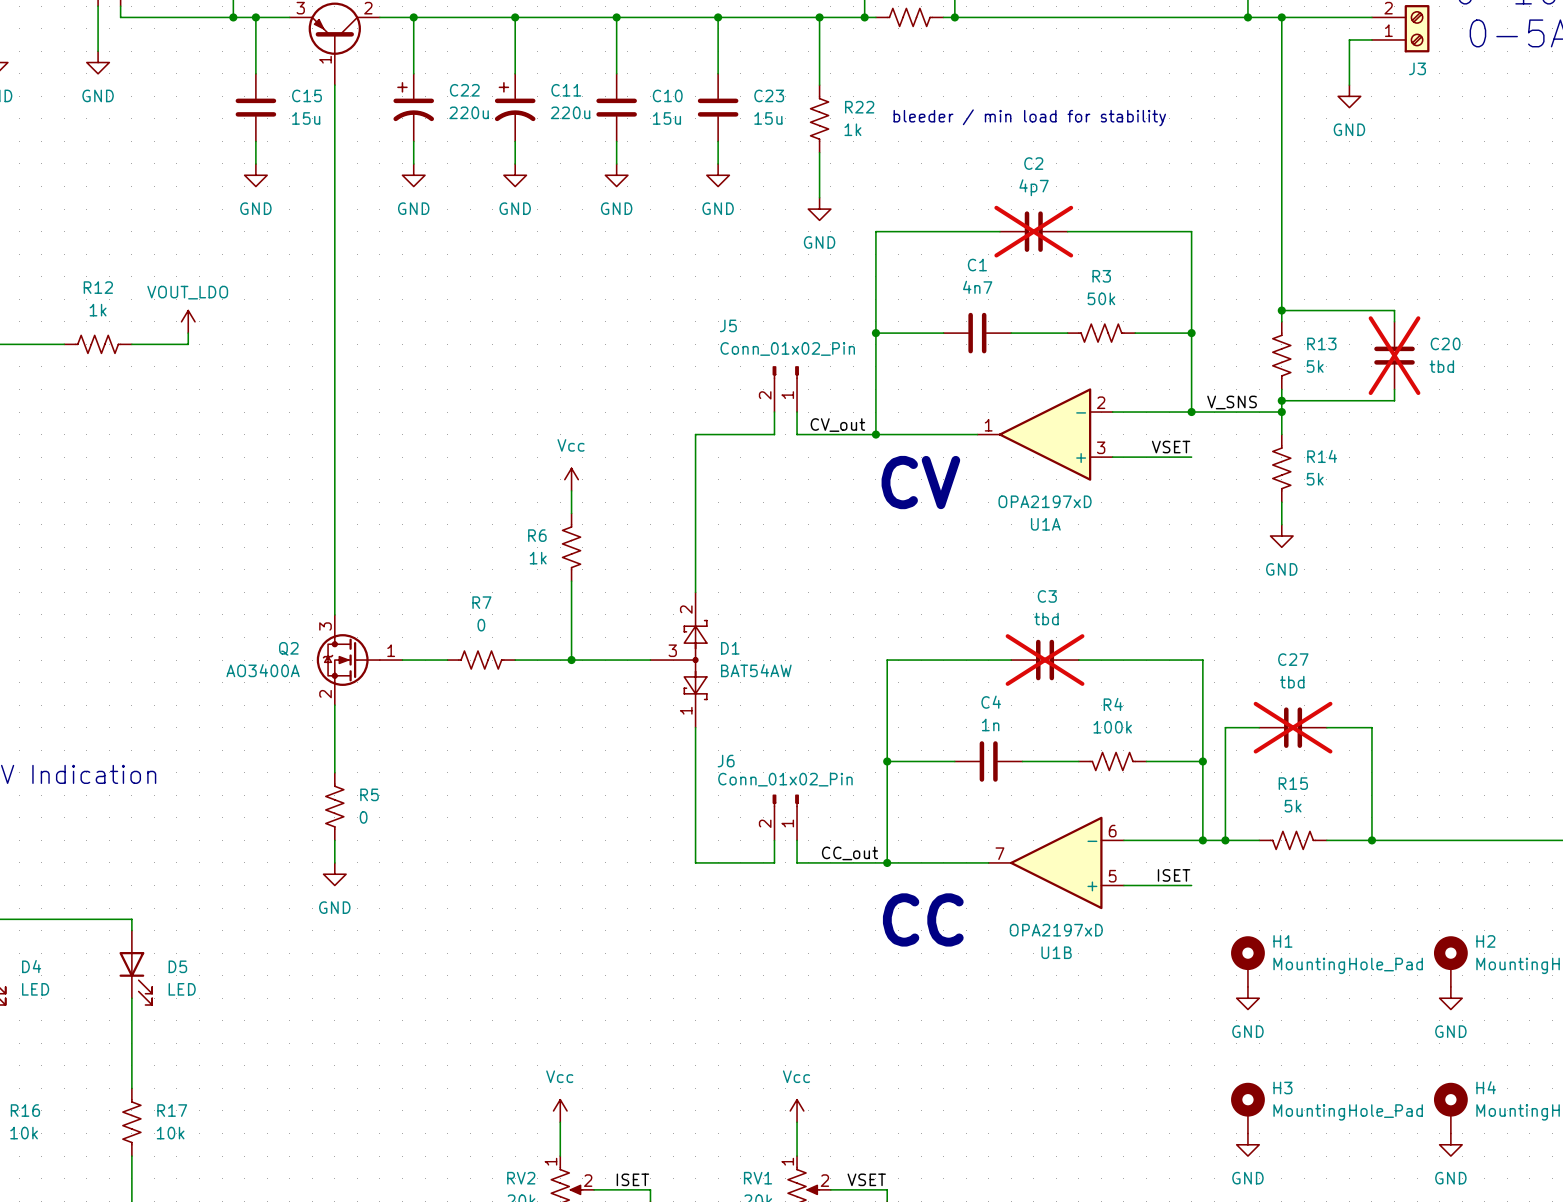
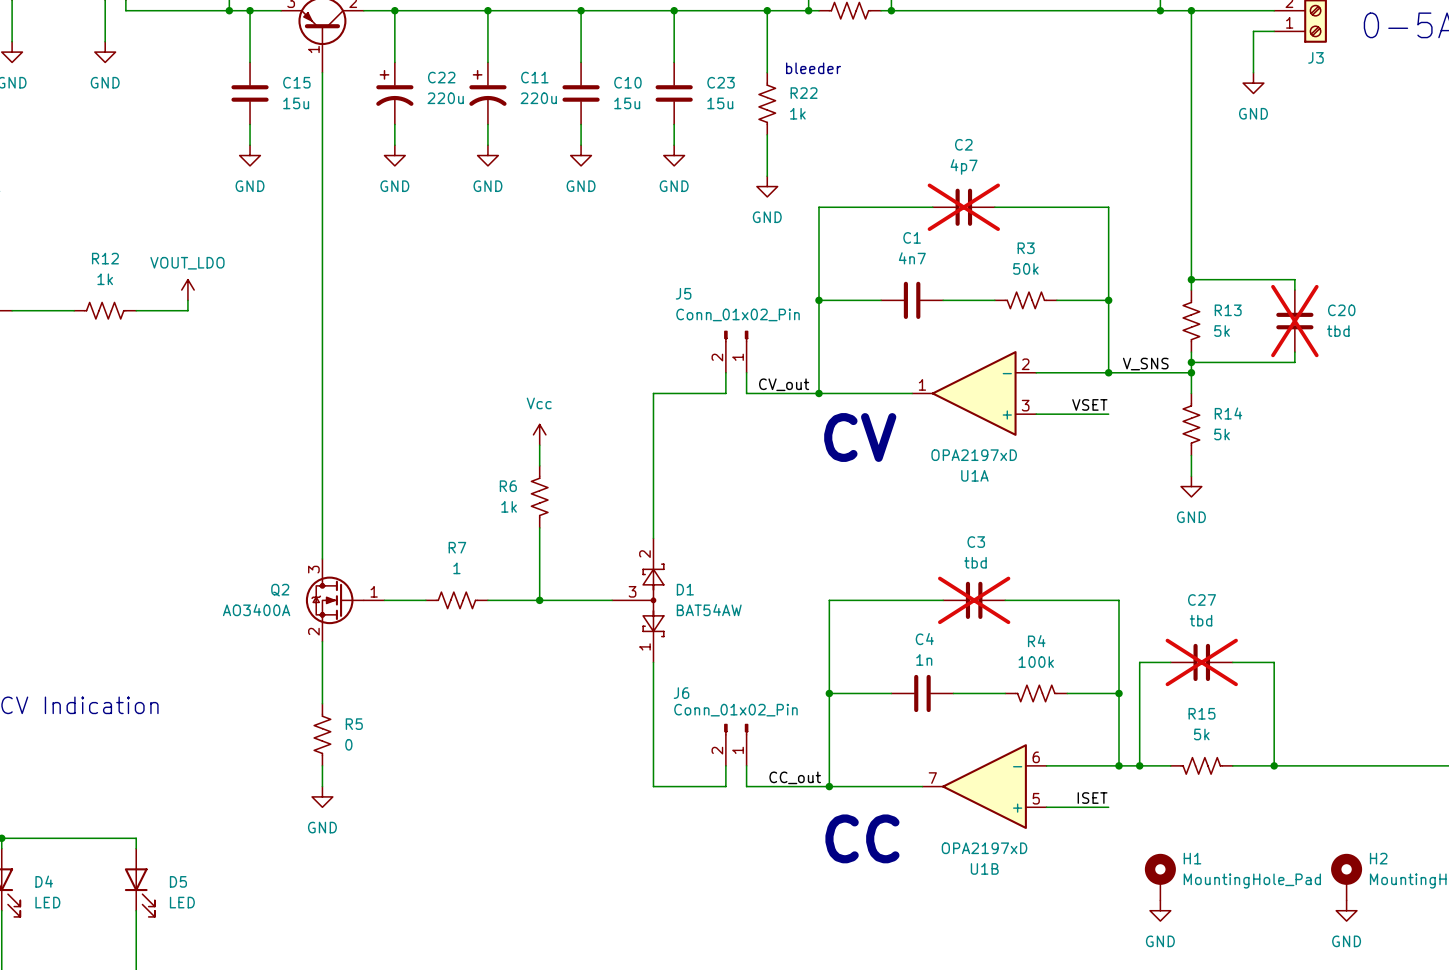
text: none -> bleeder (813, 68)
text: bleeder / min load for stability (1029, 117) -> none
R7 value: 0 (481, 625) -> 1 (456, 568)

